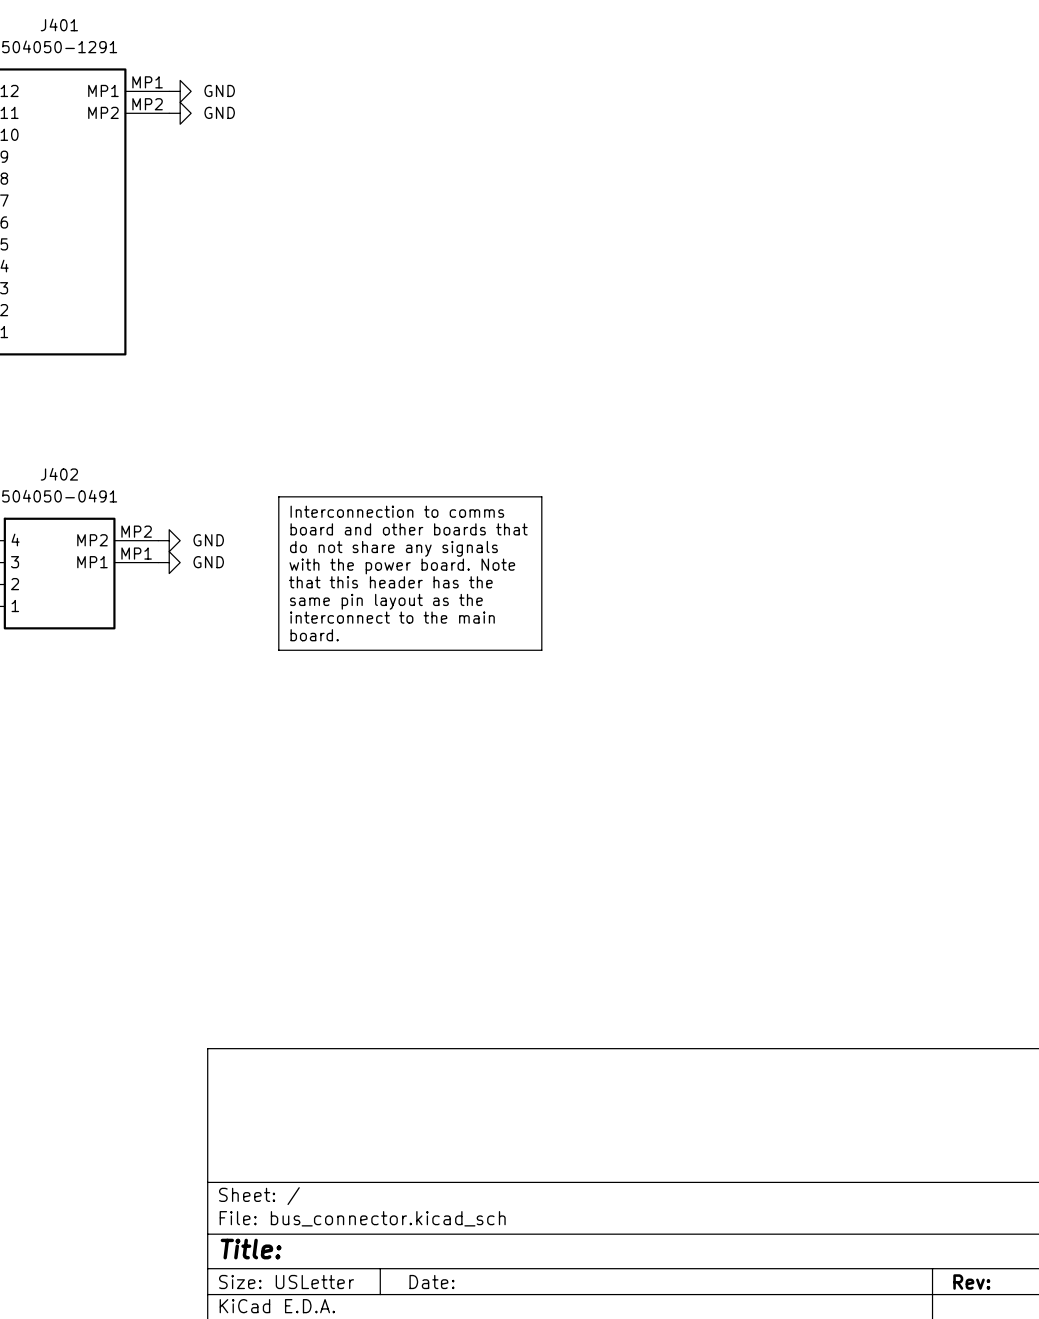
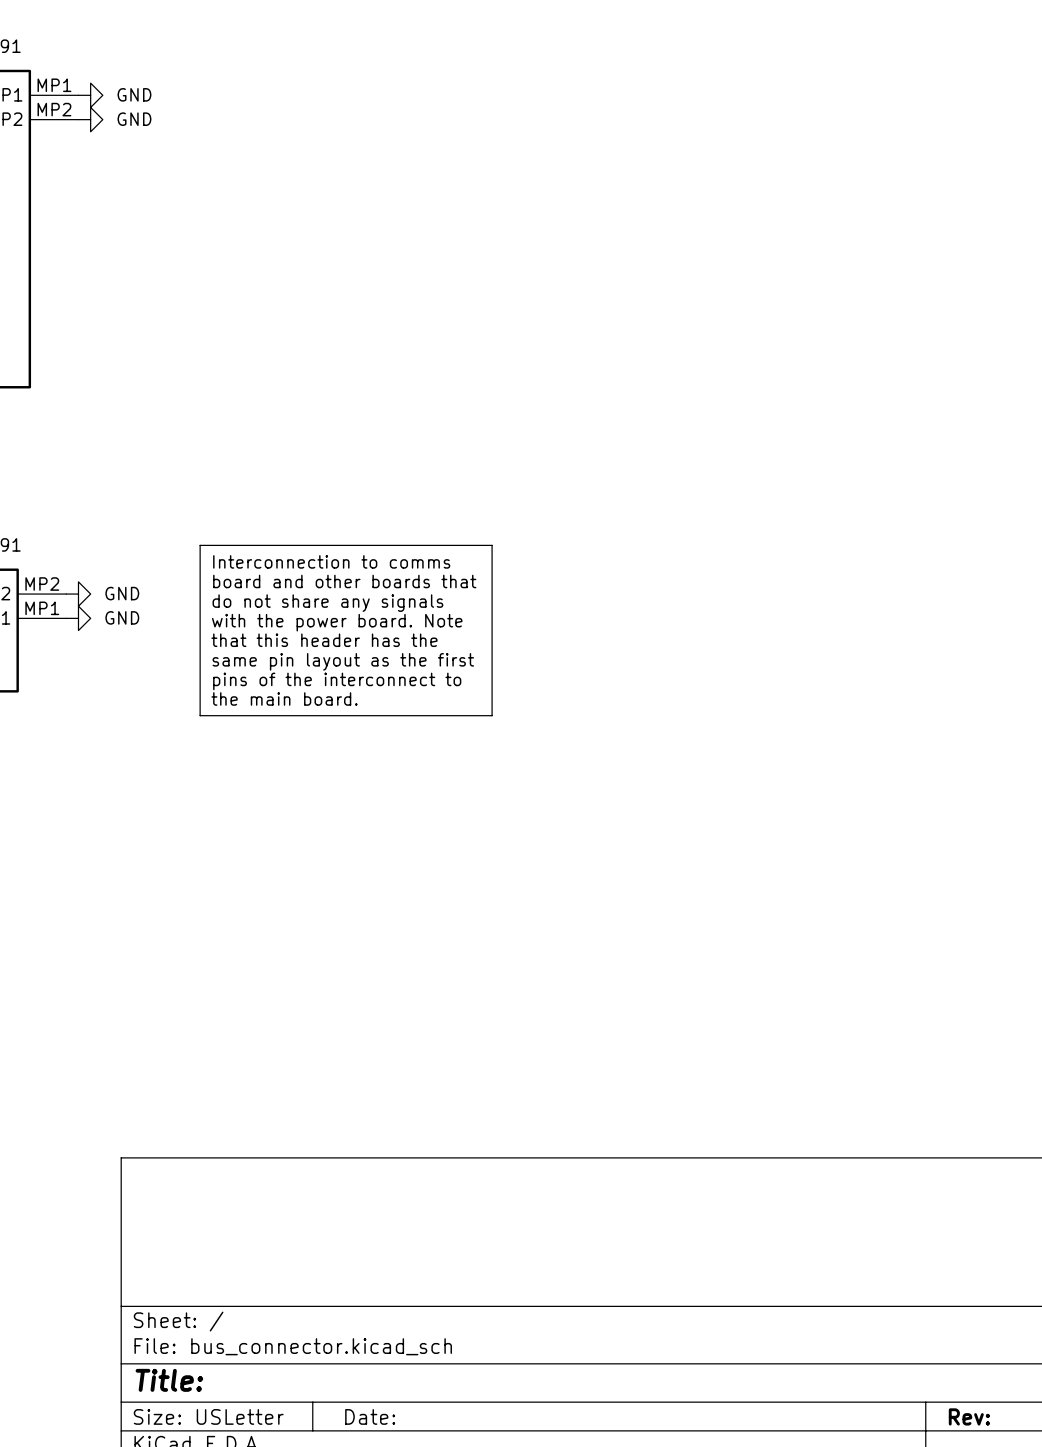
text: same pin layout as the (386, 601) -> same pin layout as the first (343, 661)
text: interconnect to the main (392, 617) -> pins of the interconnect to (337, 681)
text: board. (314, 635) -> the main board. (284, 698)

